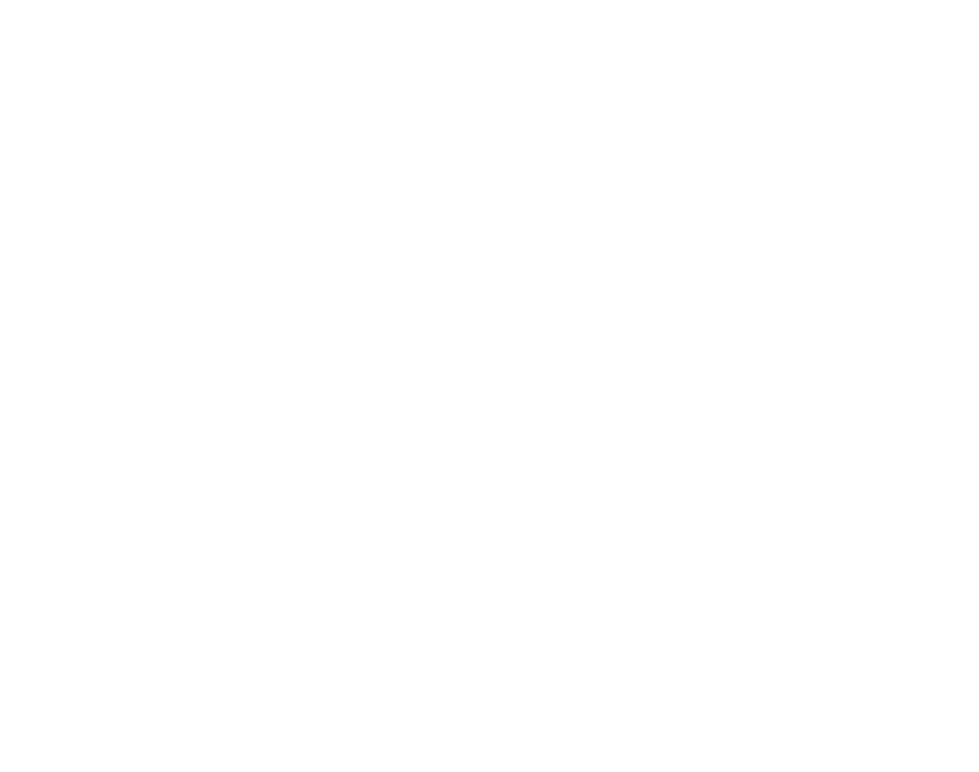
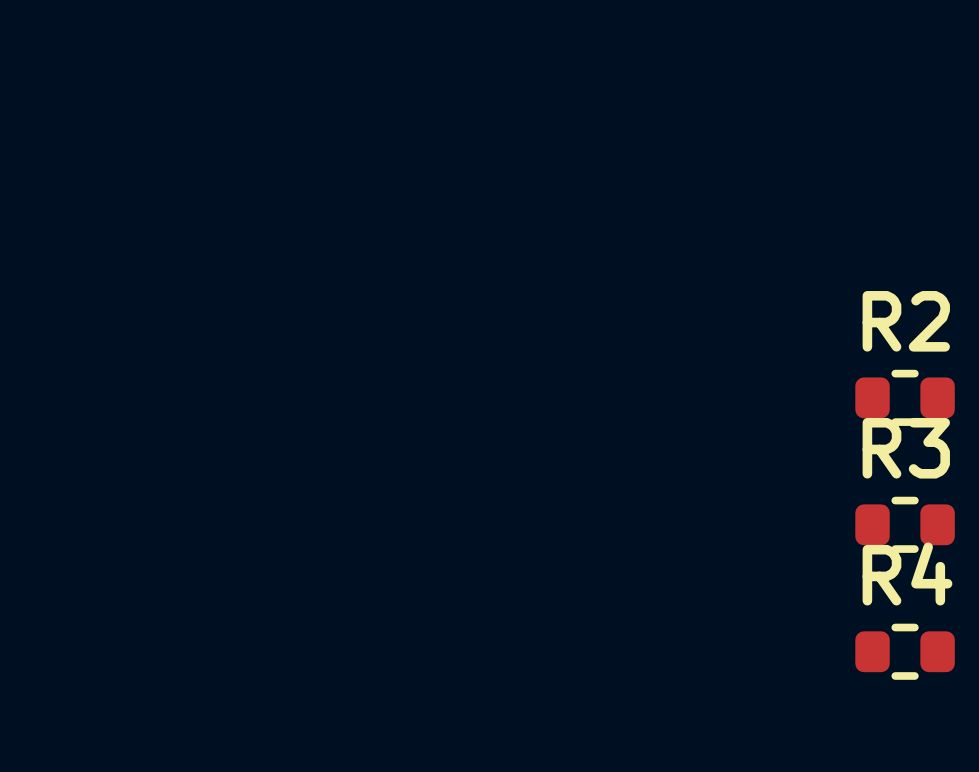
R2: none -> (905, 397)
R3: none -> (905, 524)
R4: none -> (905, 651)

